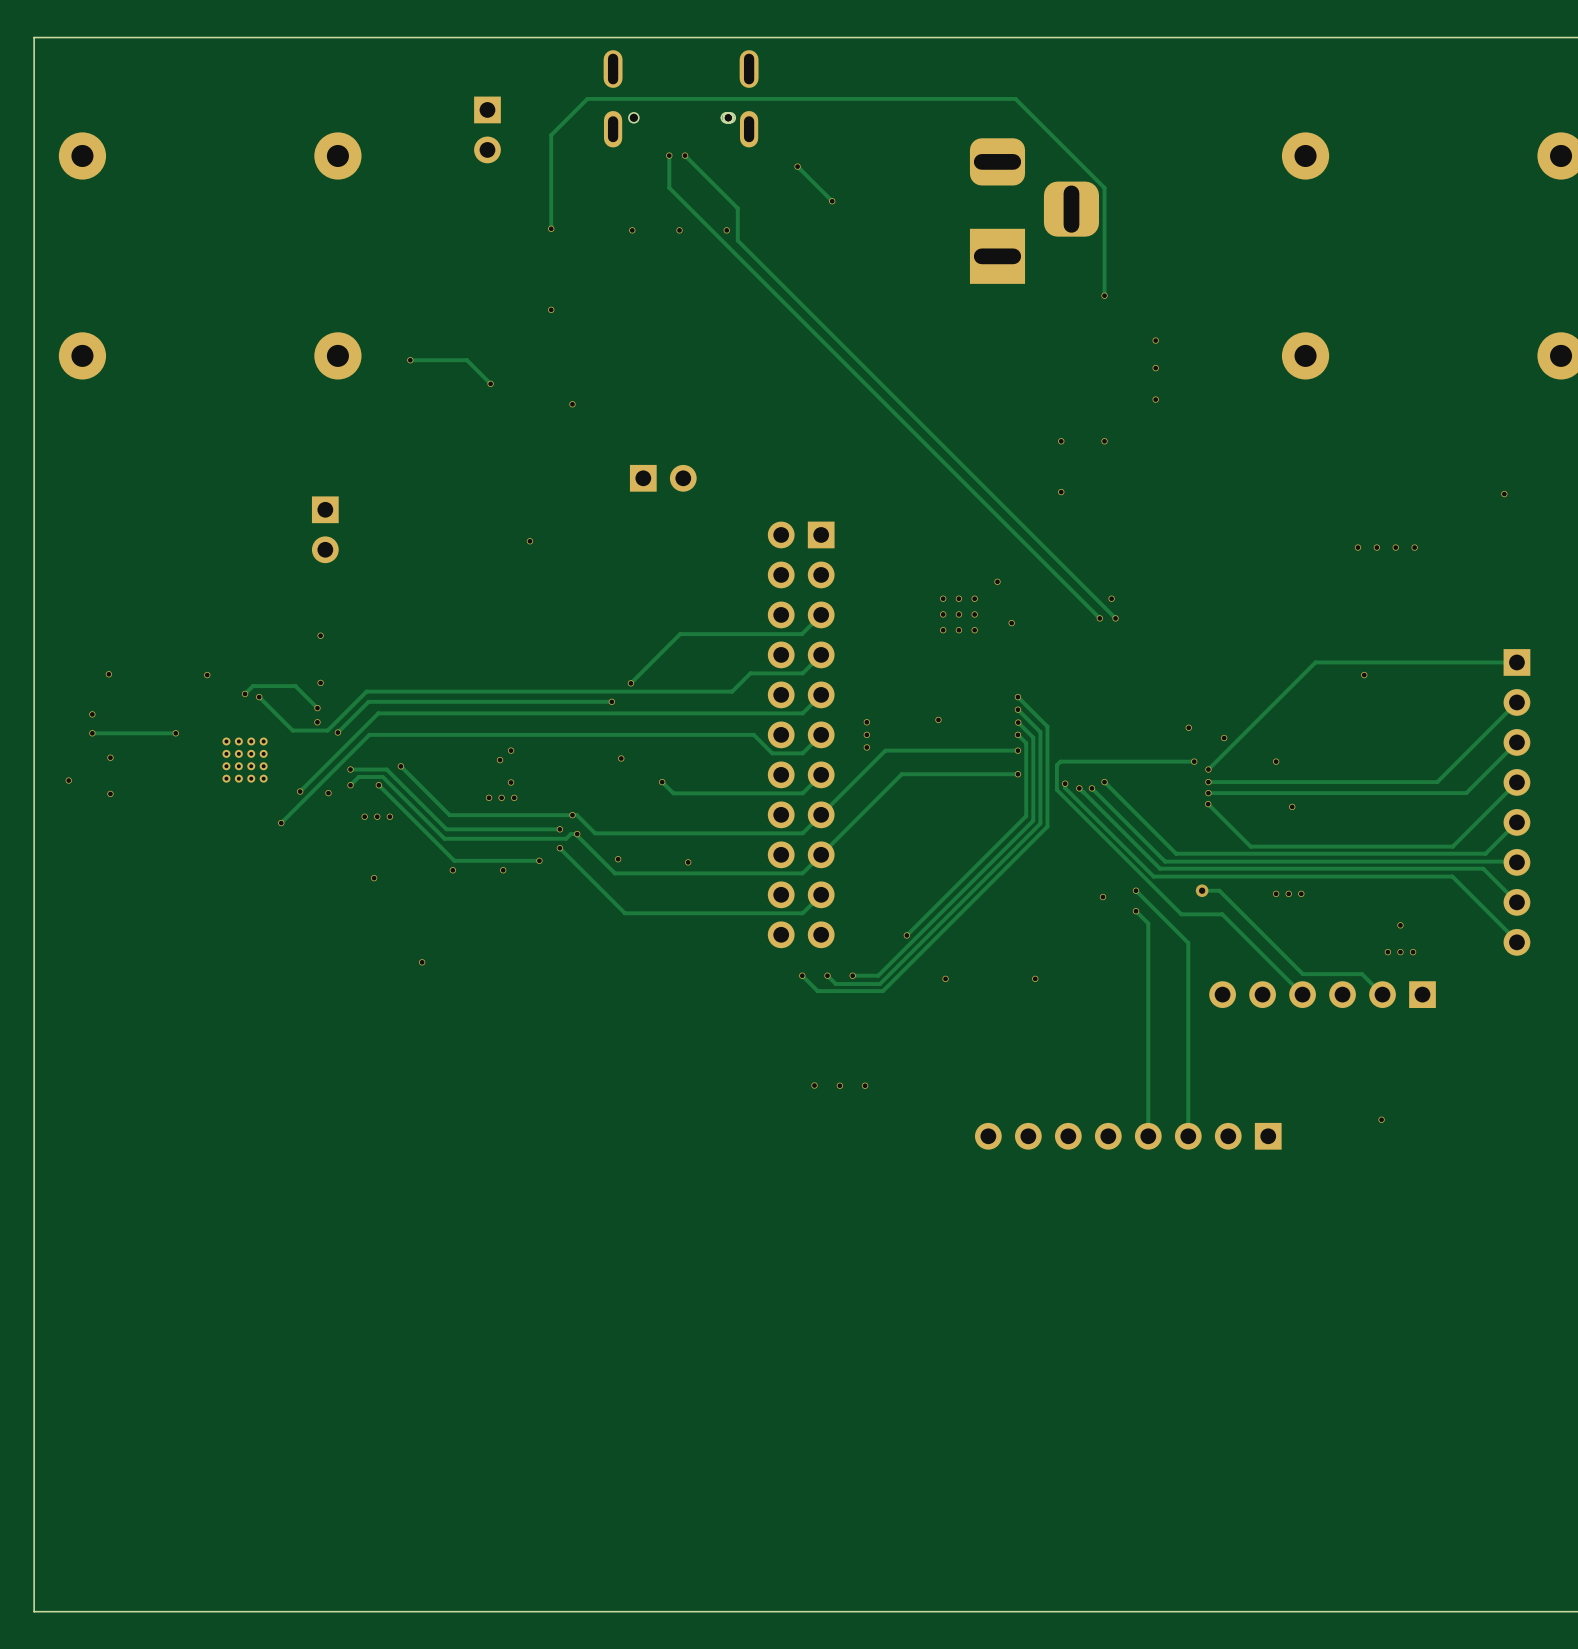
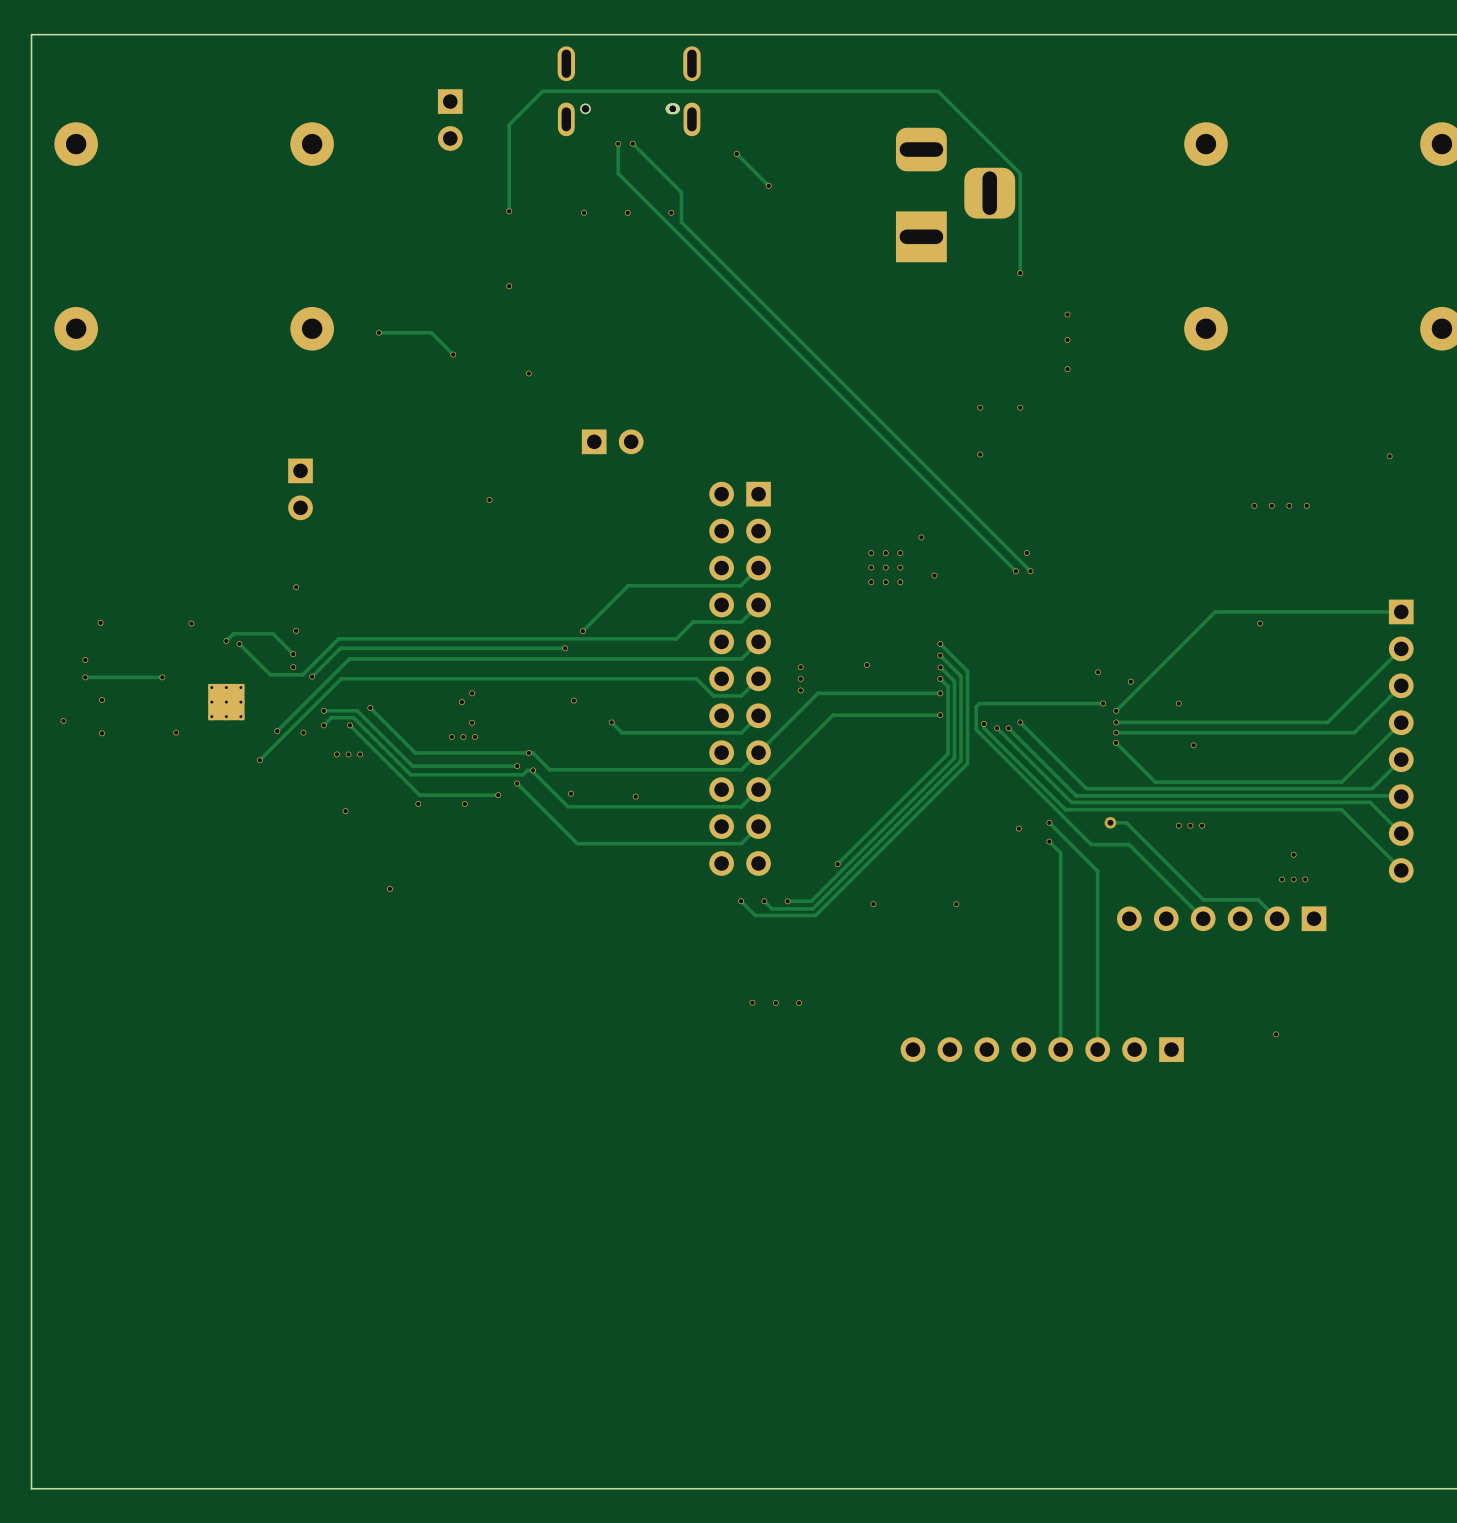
part footprint: [222, 737, 268, 783] -> [208, 683, 245, 721]
via: none -> (176, 732)

